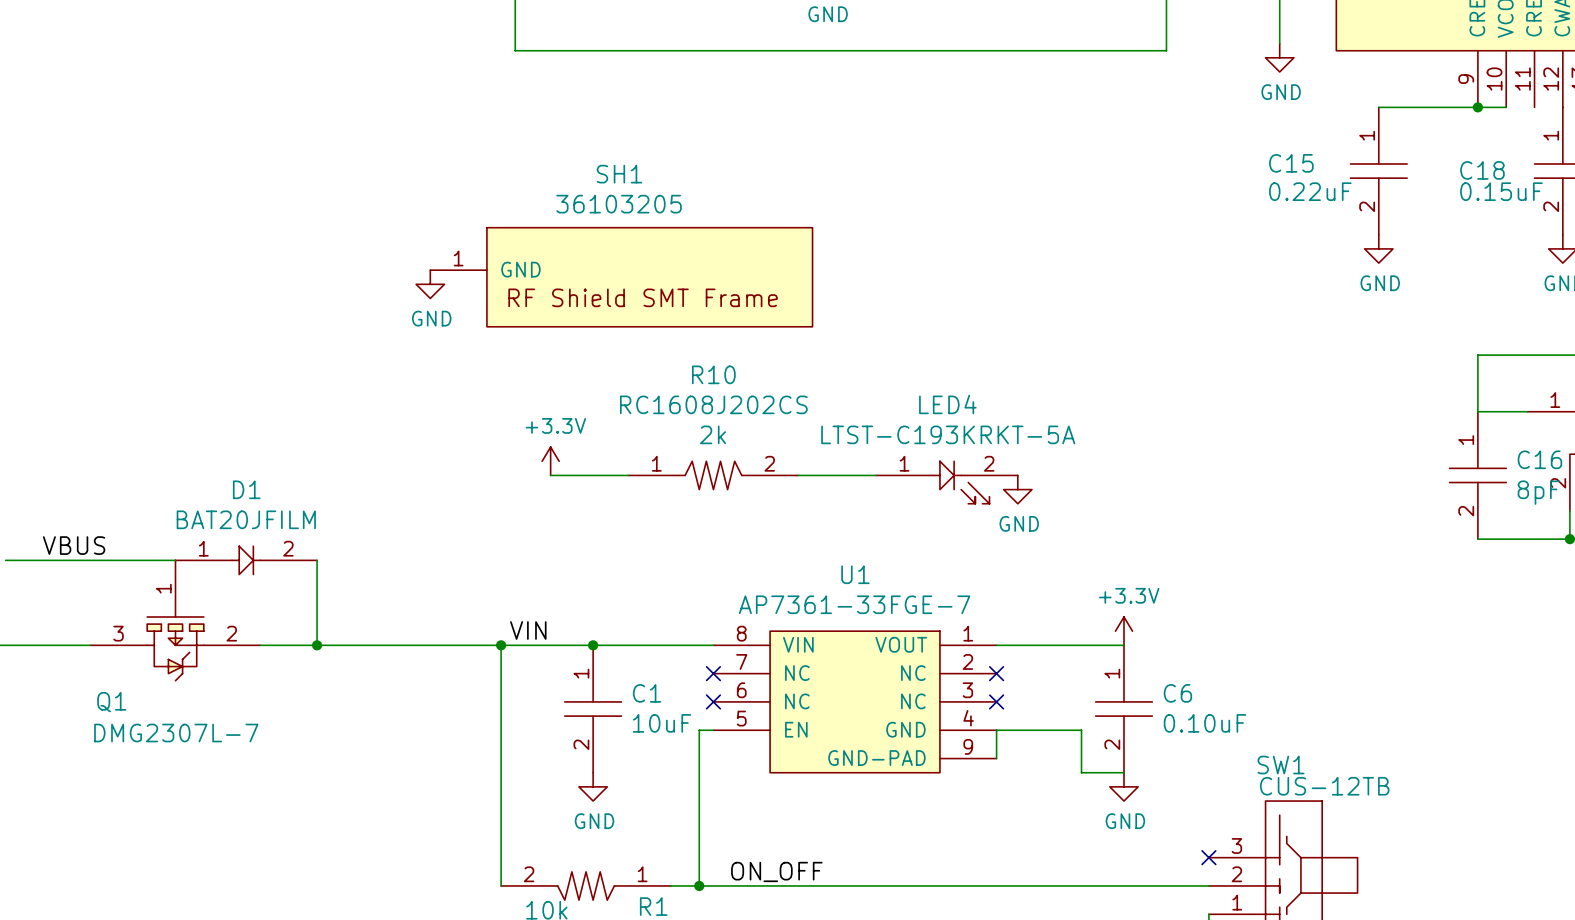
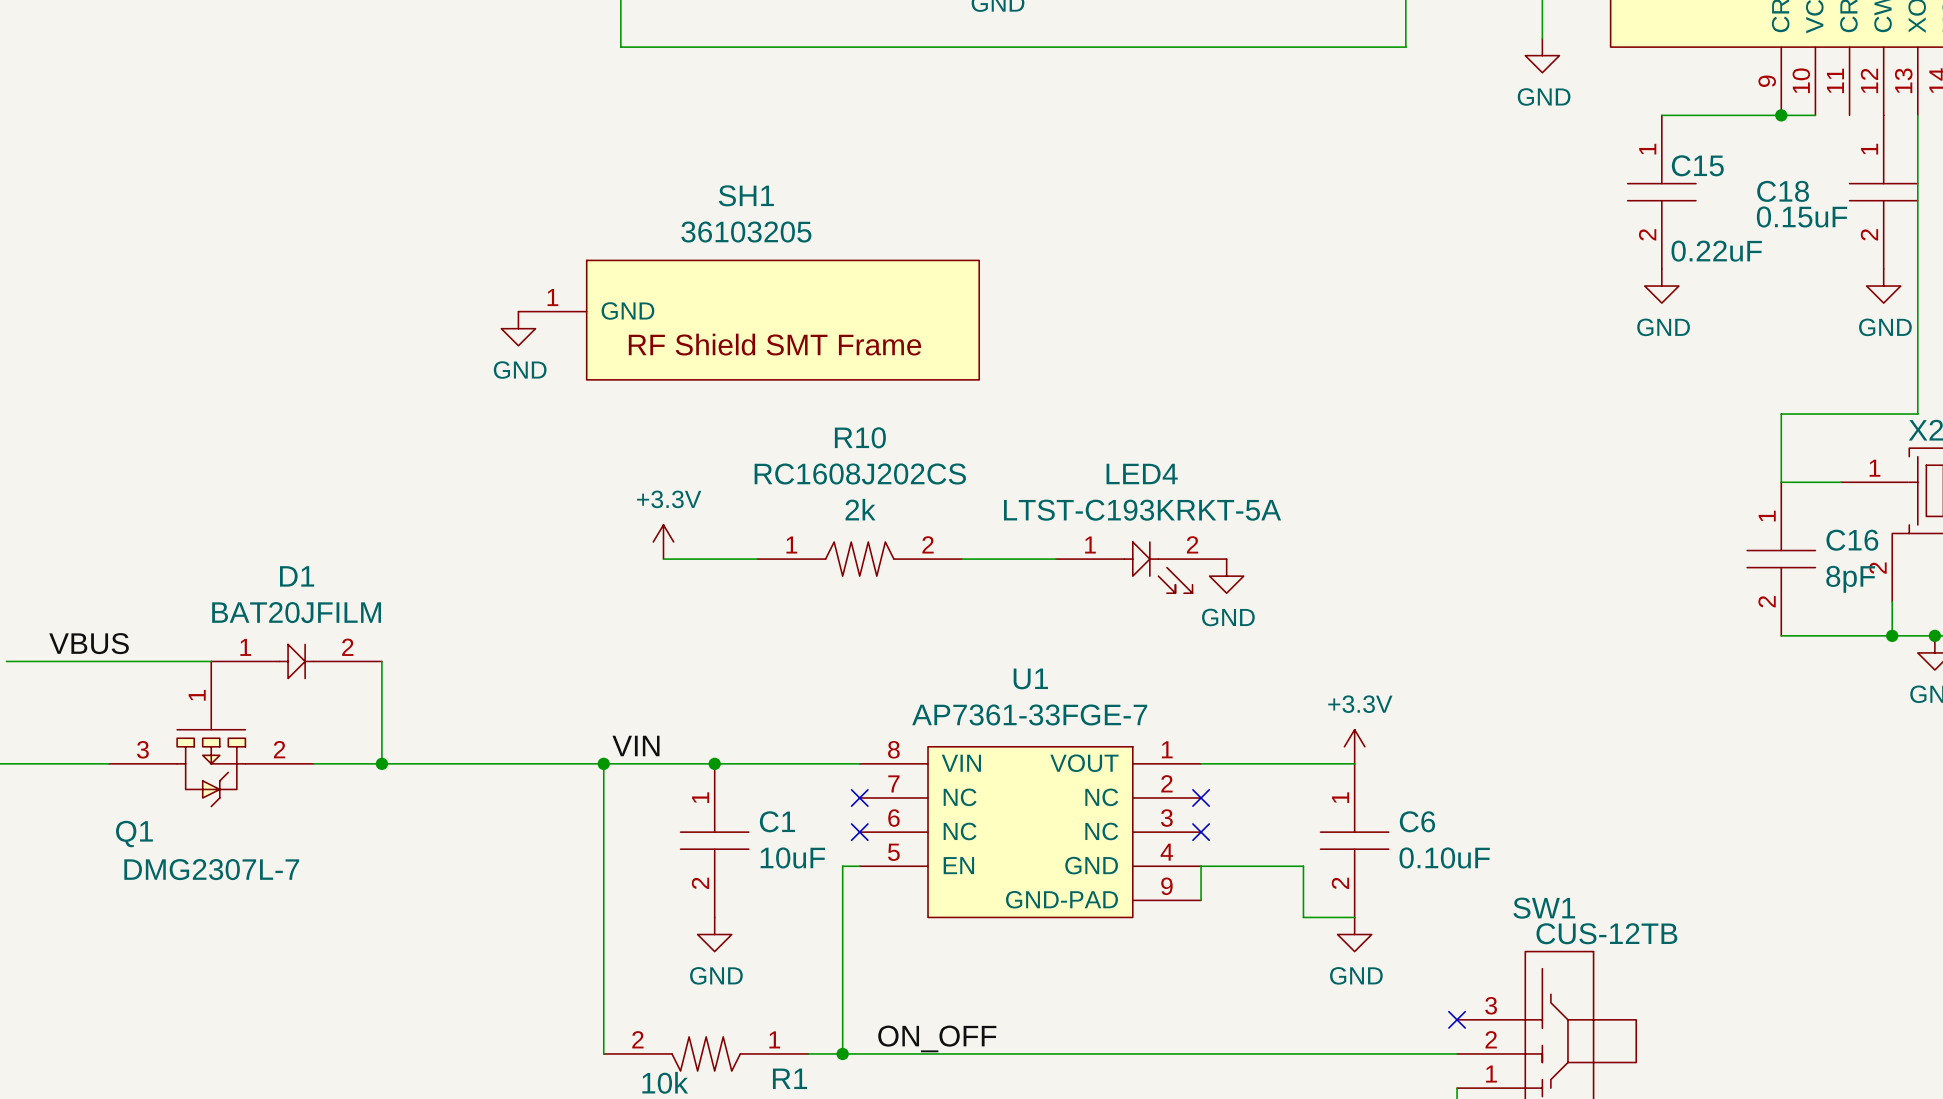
C15 name position: C15 (1291, 163) -> C15 (1697, 165)
C15 text: 0.22uF (1310, 191) -> none
C15 text: none -> 0.22uF (1716, 251)

